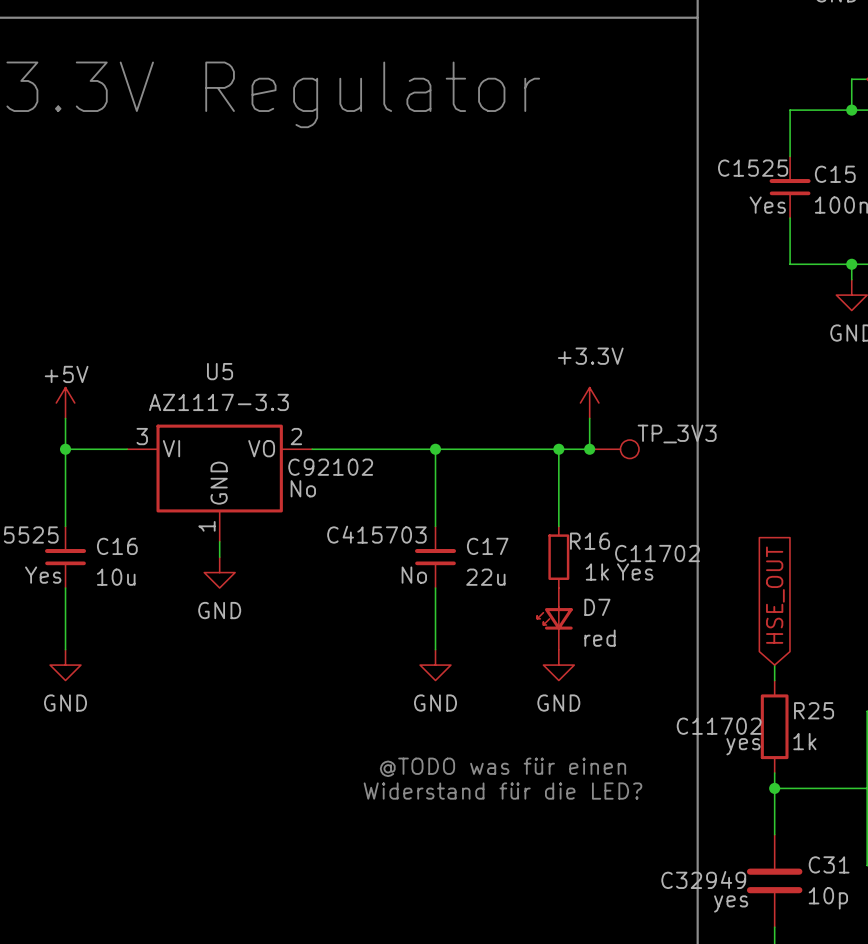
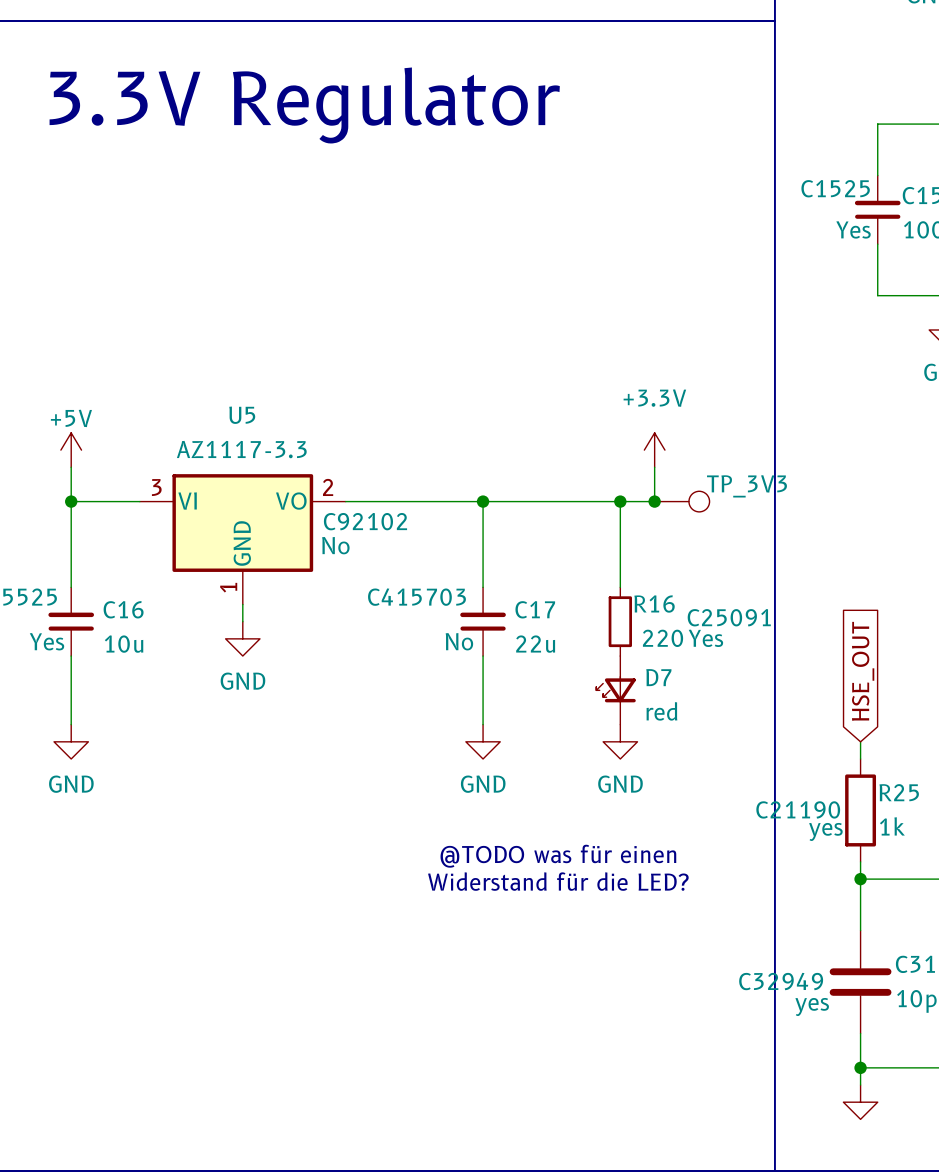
R16 text: C11702 (657, 553) -> C25091 (729, 617)
R16 value: 1k (597, 572) -> 220 (663, 638)
R25 text: C11702 (719, 726) -> C21190 (798, 809)

